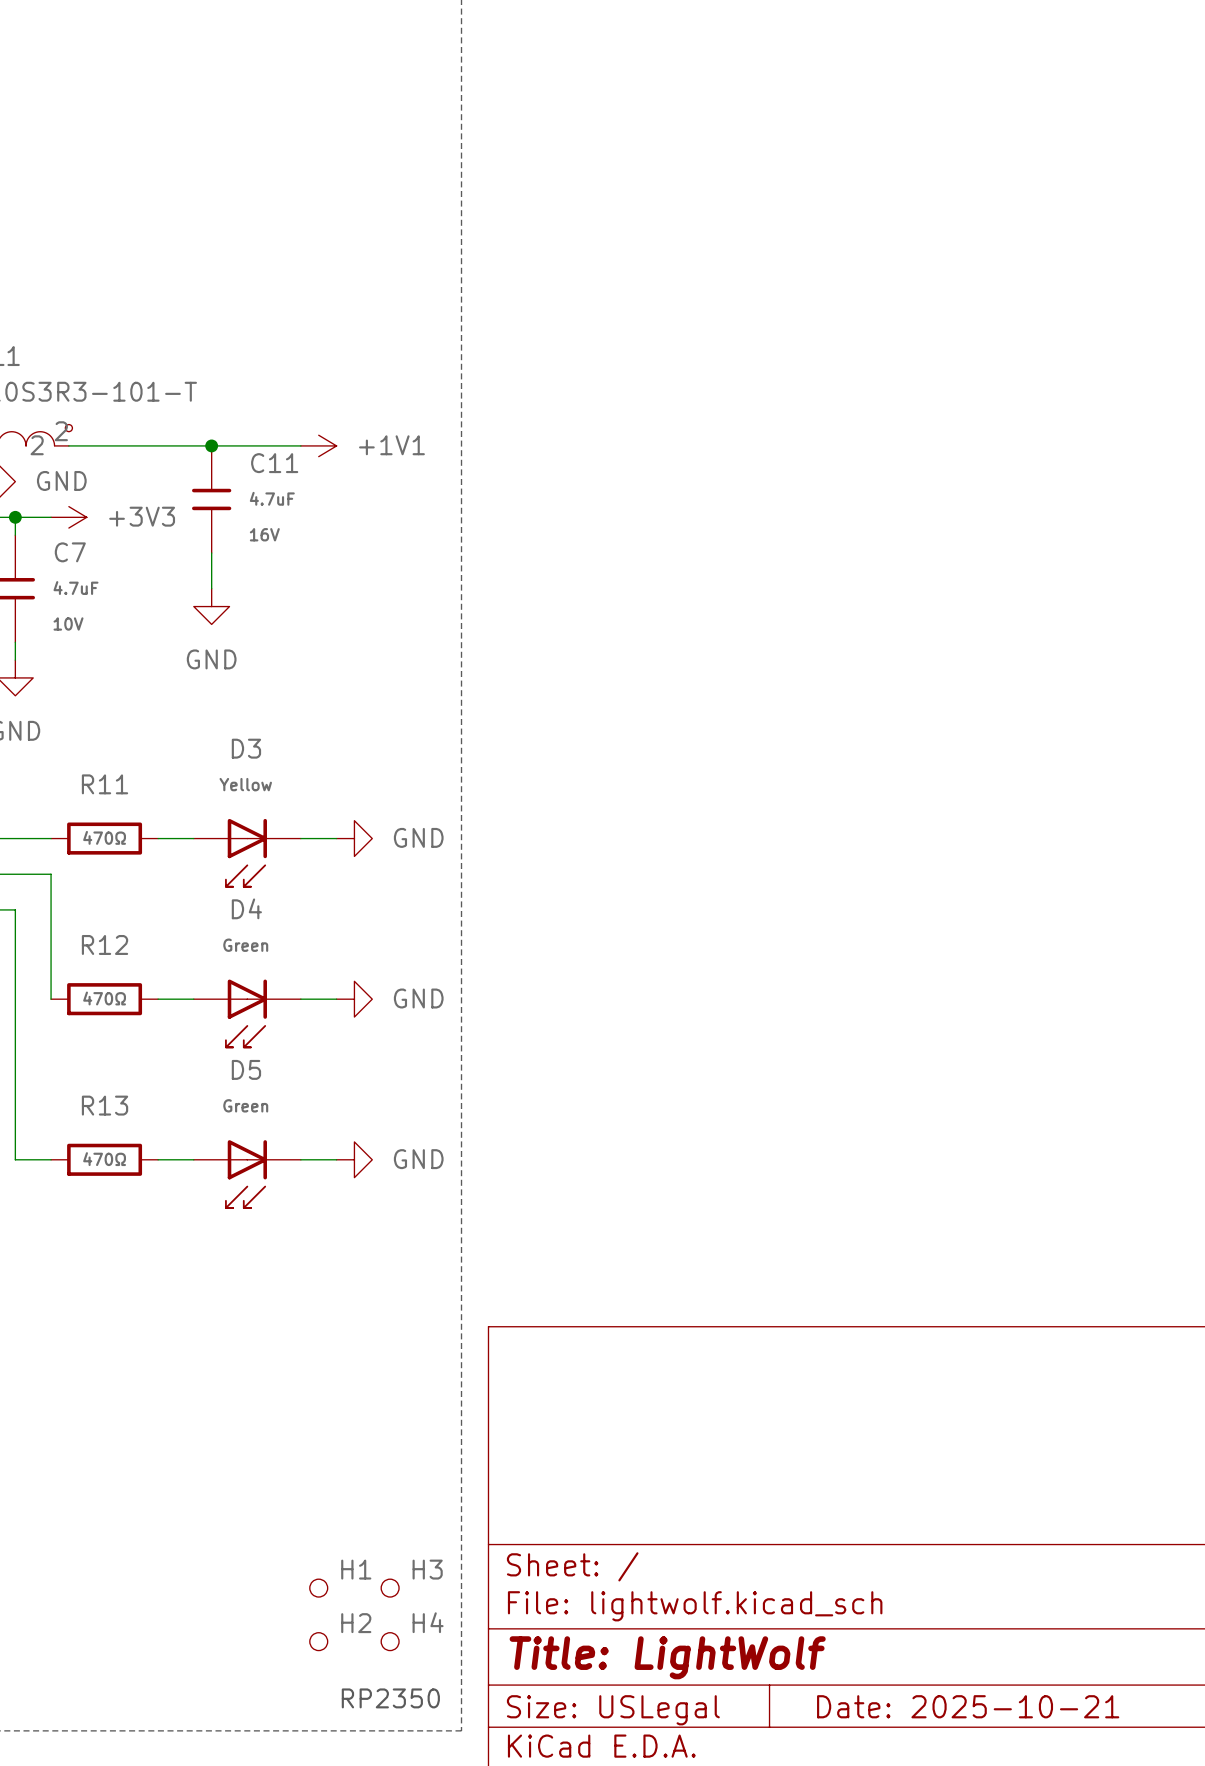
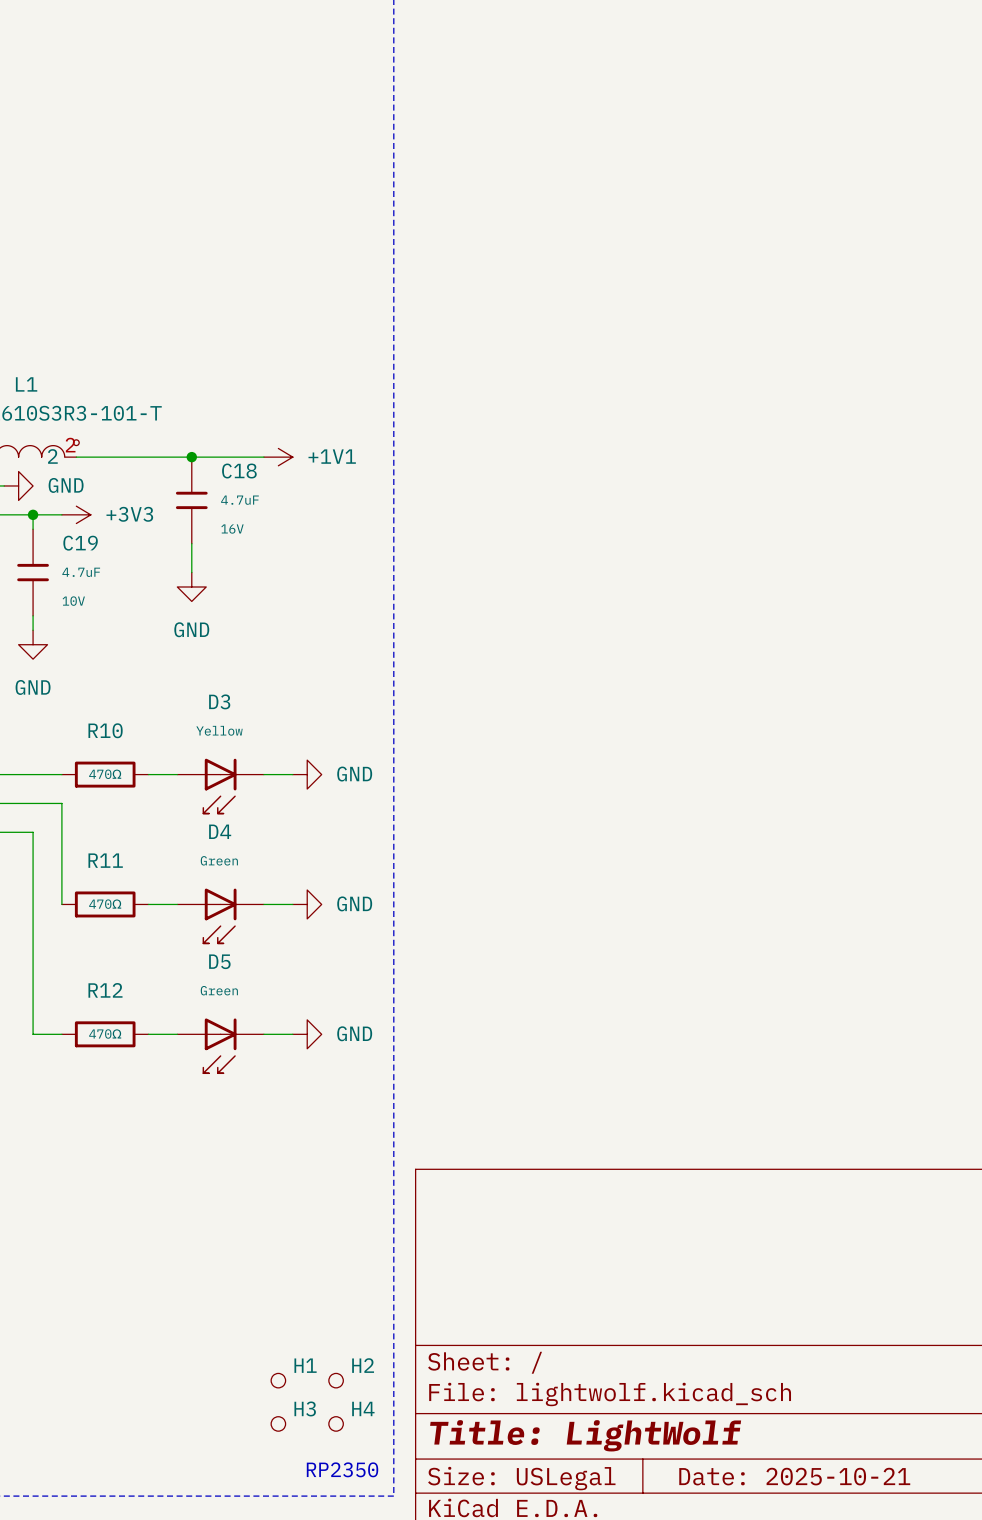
C11 name: C11 (274, 463) -> C18 (239, 471)
C7 name: C7 (70, 552) -> C19 (80, 543)
R11 name: R11 (105, 784) -> R10 (105, 730)
R12 name: R12 (105, 944) -> R11 (105, 860)
R13 name: R13 (105, 1105) -> R12 (105, 990)
H3 name: H3 (427, 1569) -> H2 (363, 1365)
H2 name: H2 (356, 1623) -> H3 (305, 1408)

